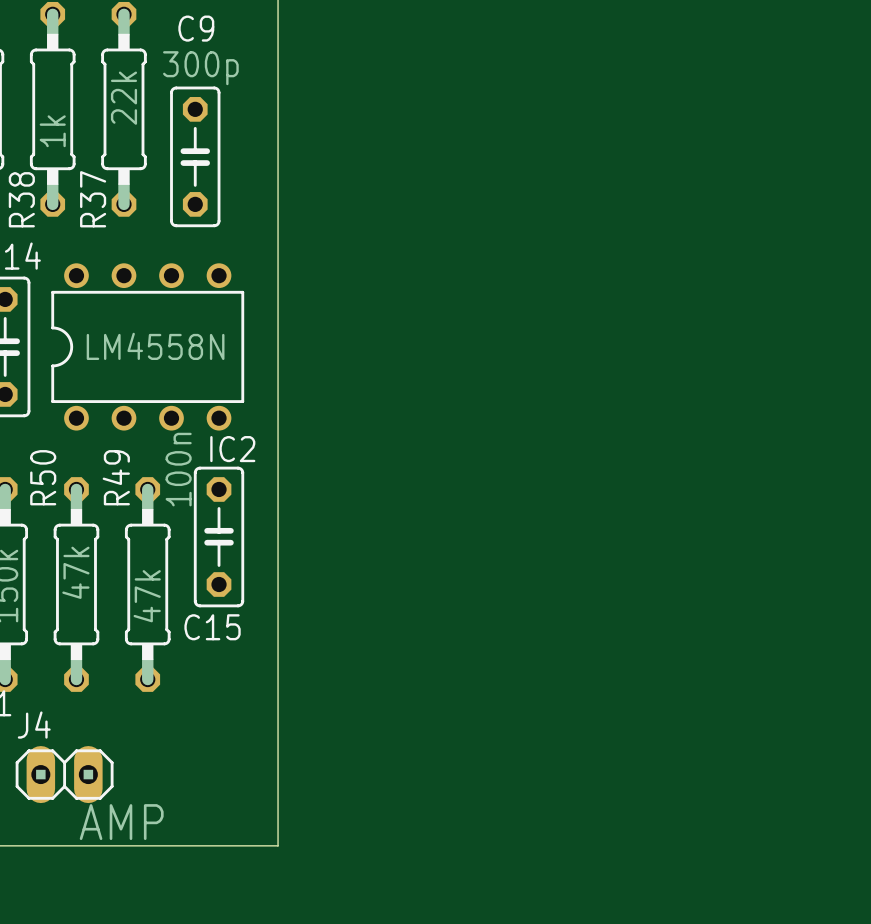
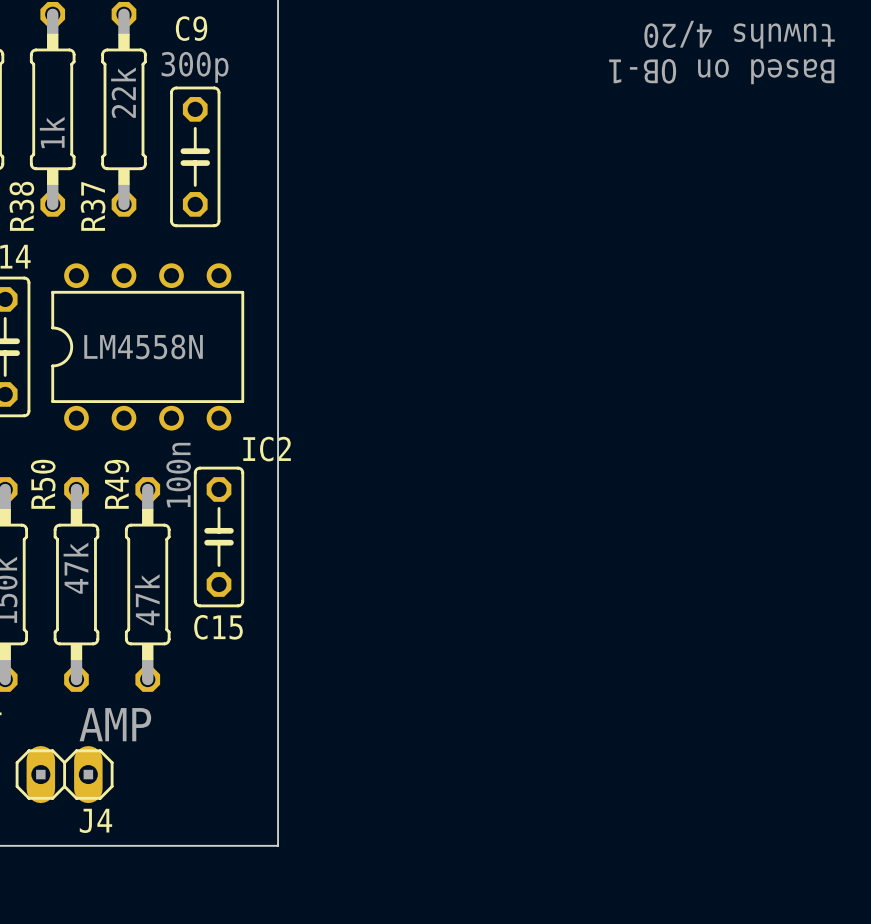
text: none -> tuwuhs 4/20 (739, 34)
text: none -> Based on OB-1 (721, 71)
IC2 name position: IC2 (232, 449) -> IC2 (267, 449)
J4 name position: J4 (34, 725) -> J4 (95, 820)
J4 value position: AMP (121, 822) -> AMP (115, 724)

